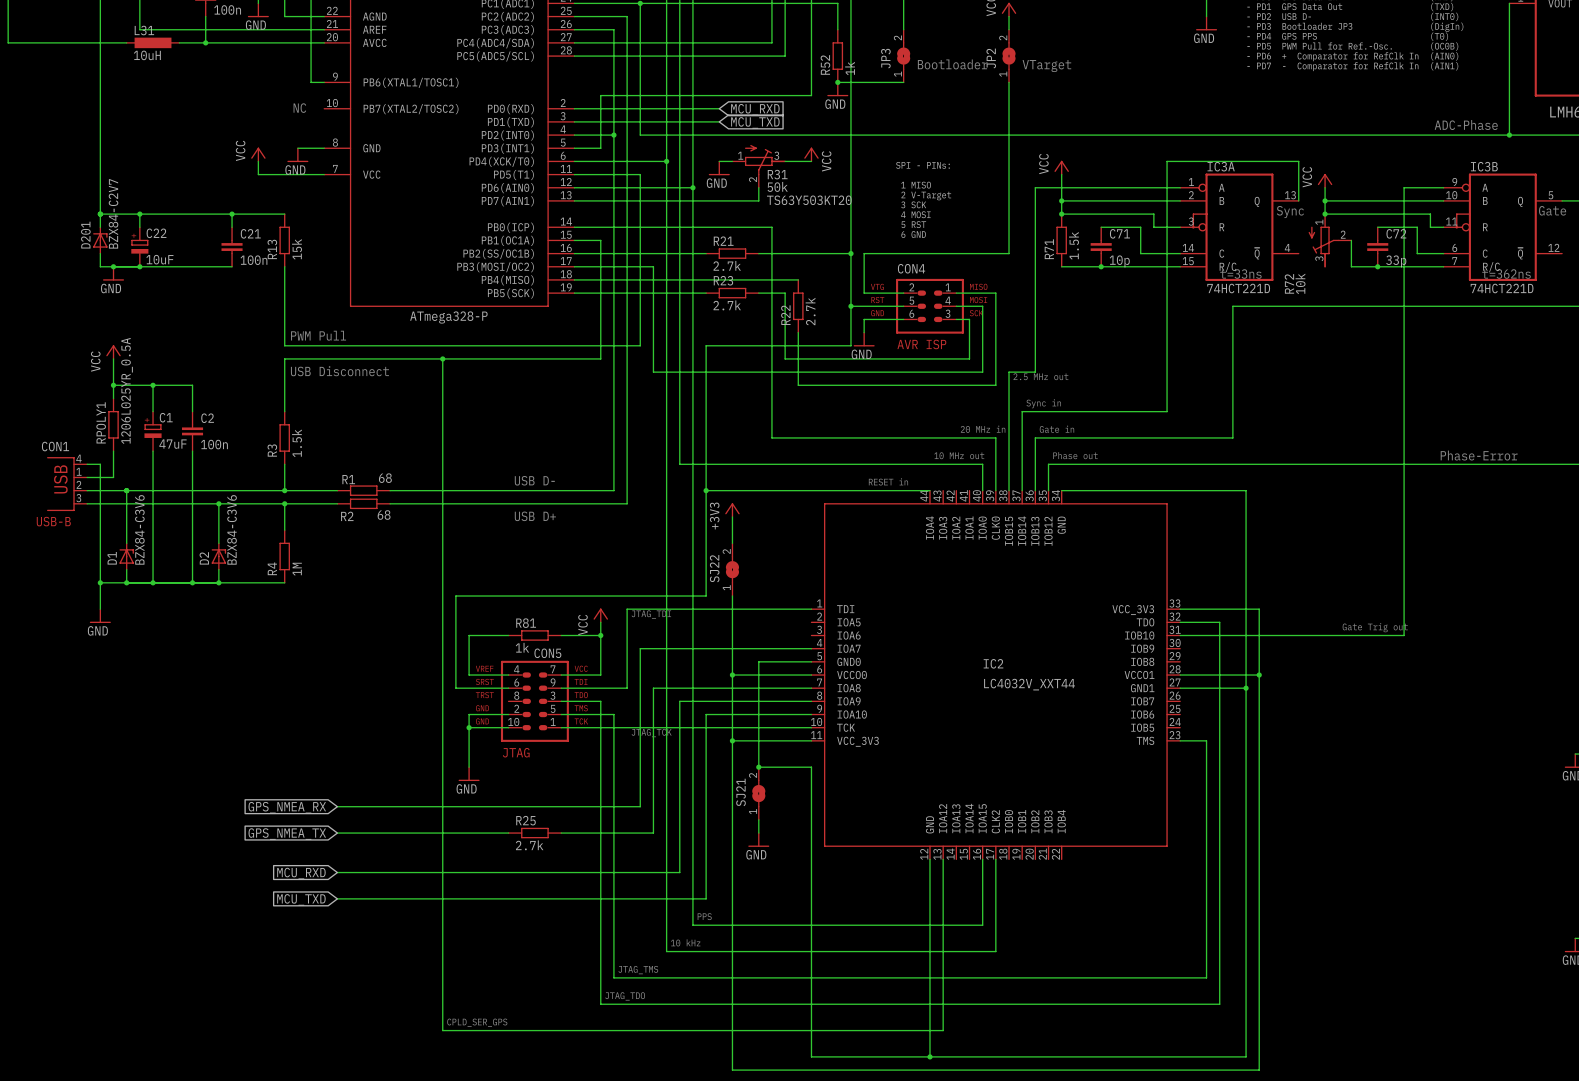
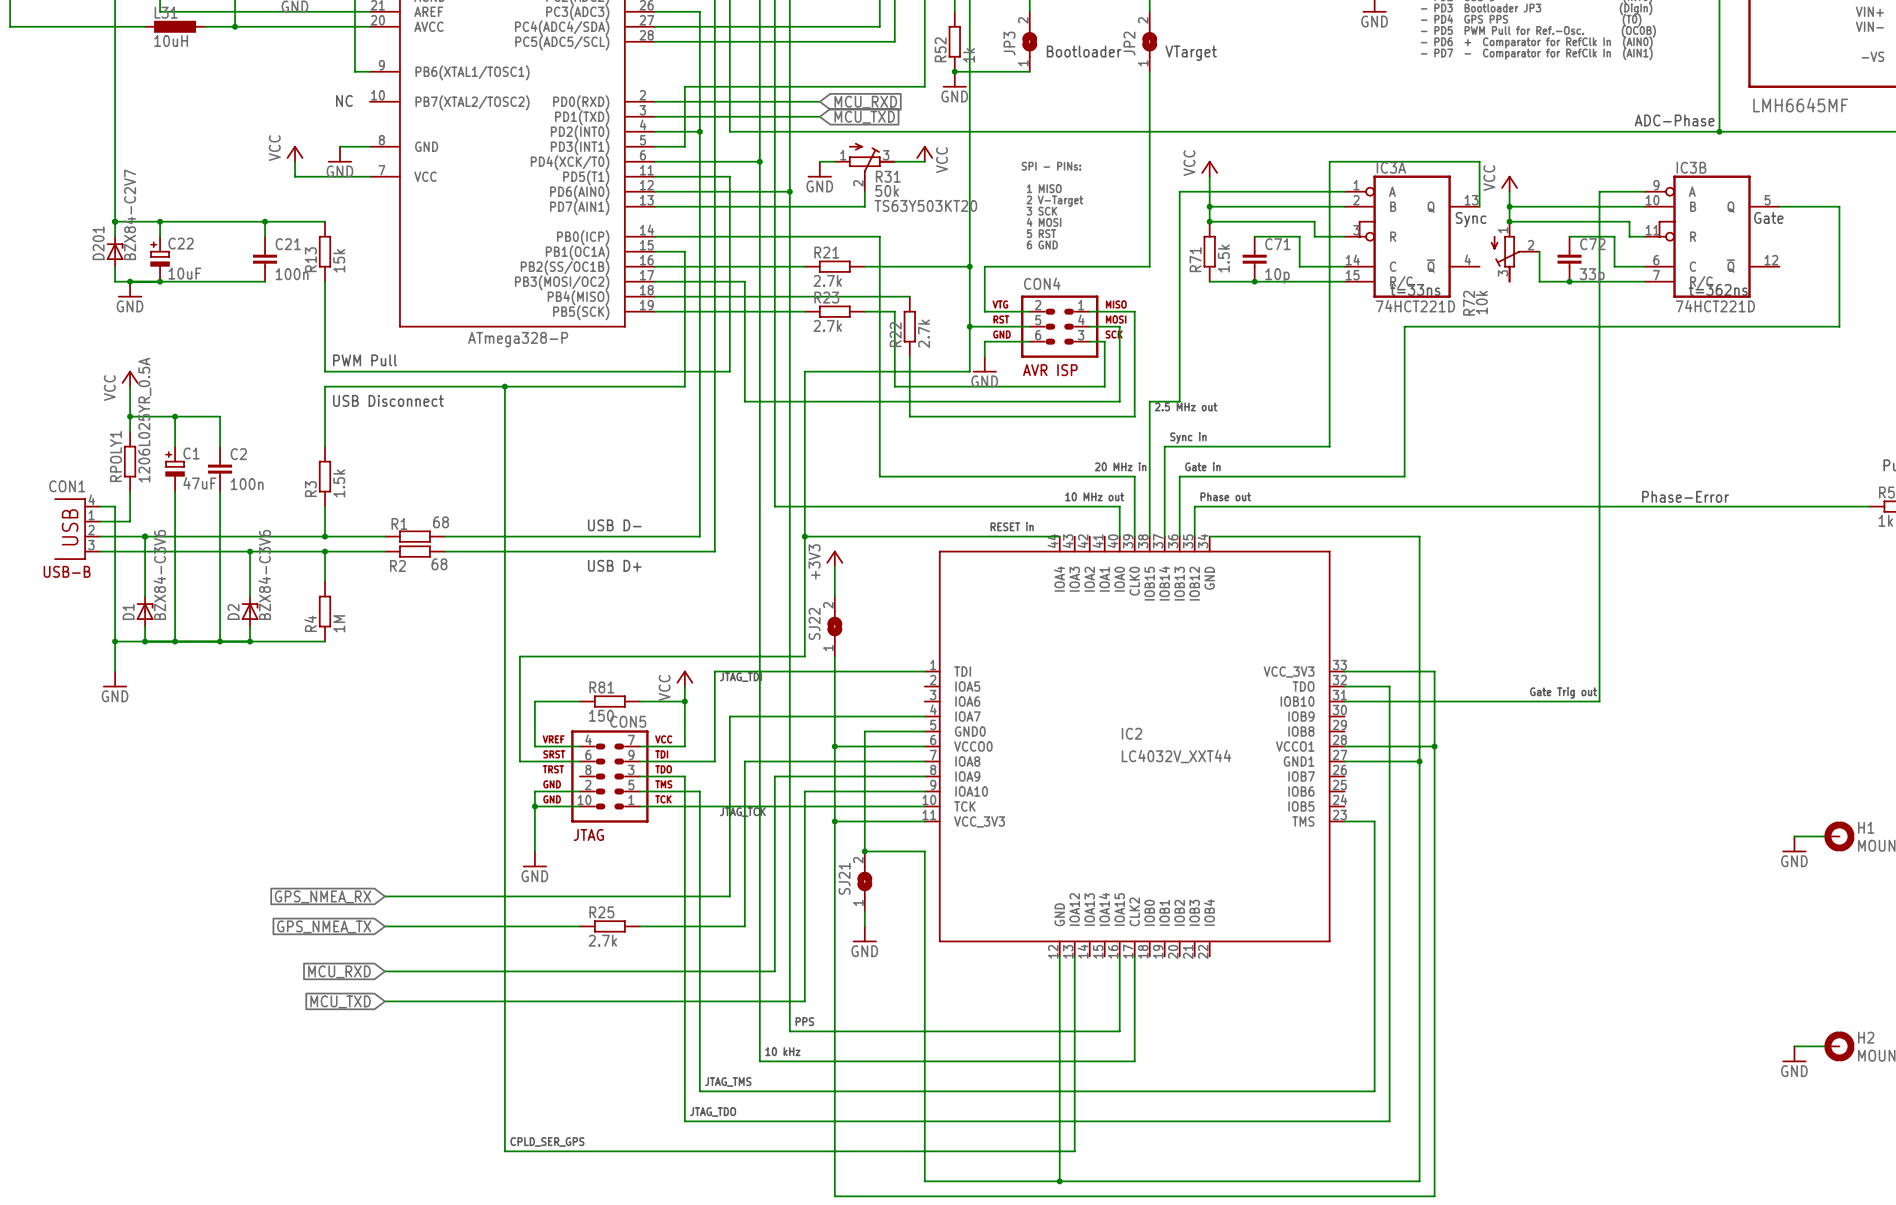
R81 value: 1k (522, 647) -> 150 (601, 715)

